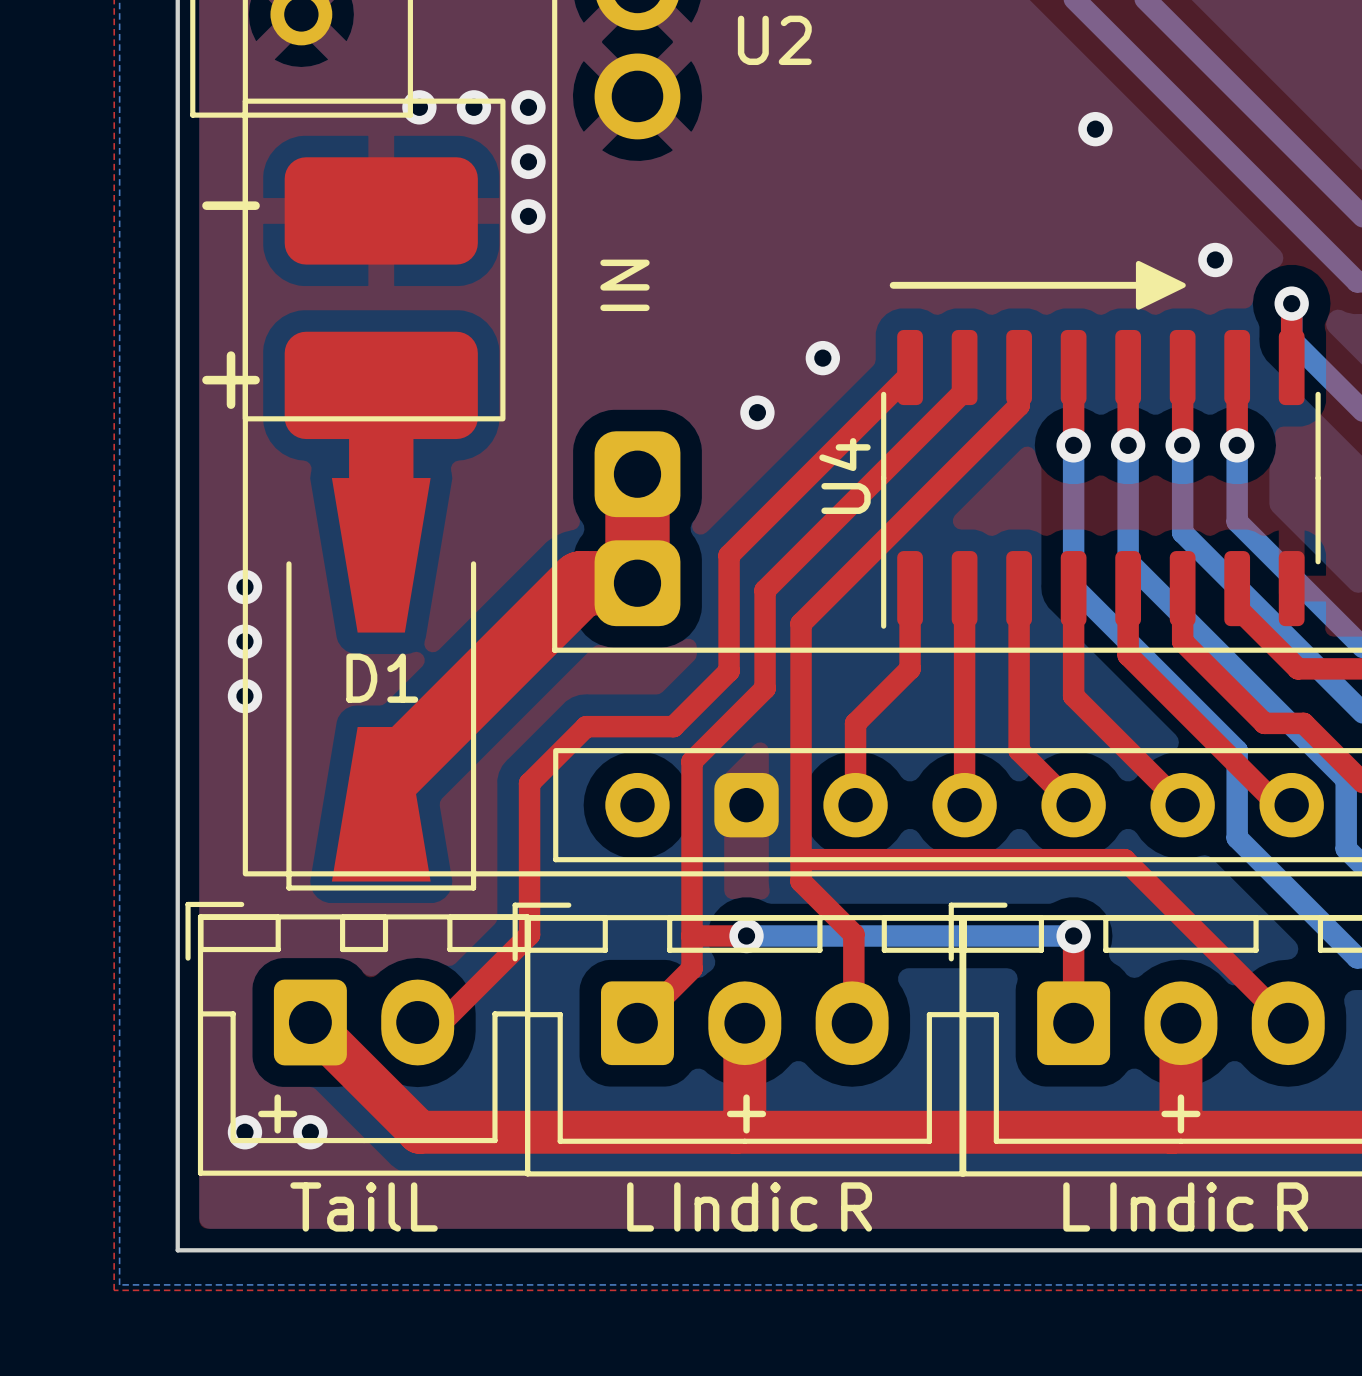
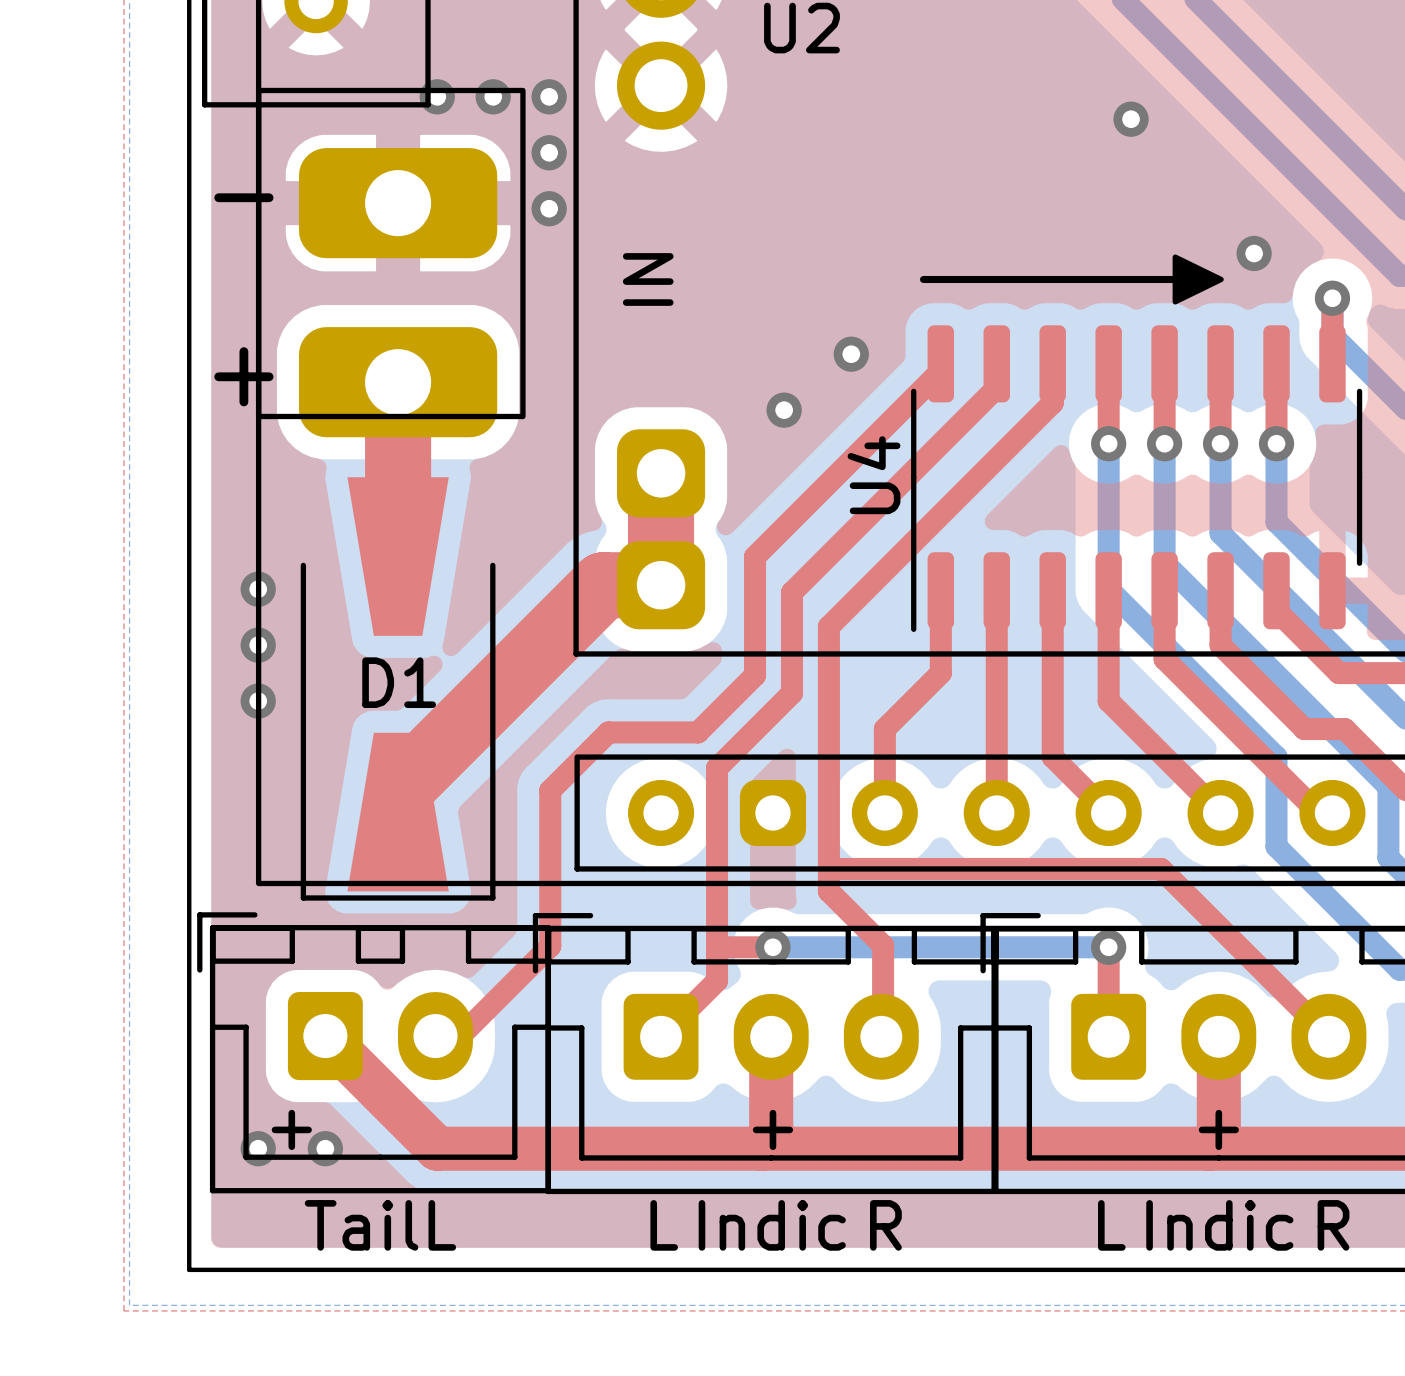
part footprint: [284, 157, 478, 440] -> [298, 148, 498, 438]

